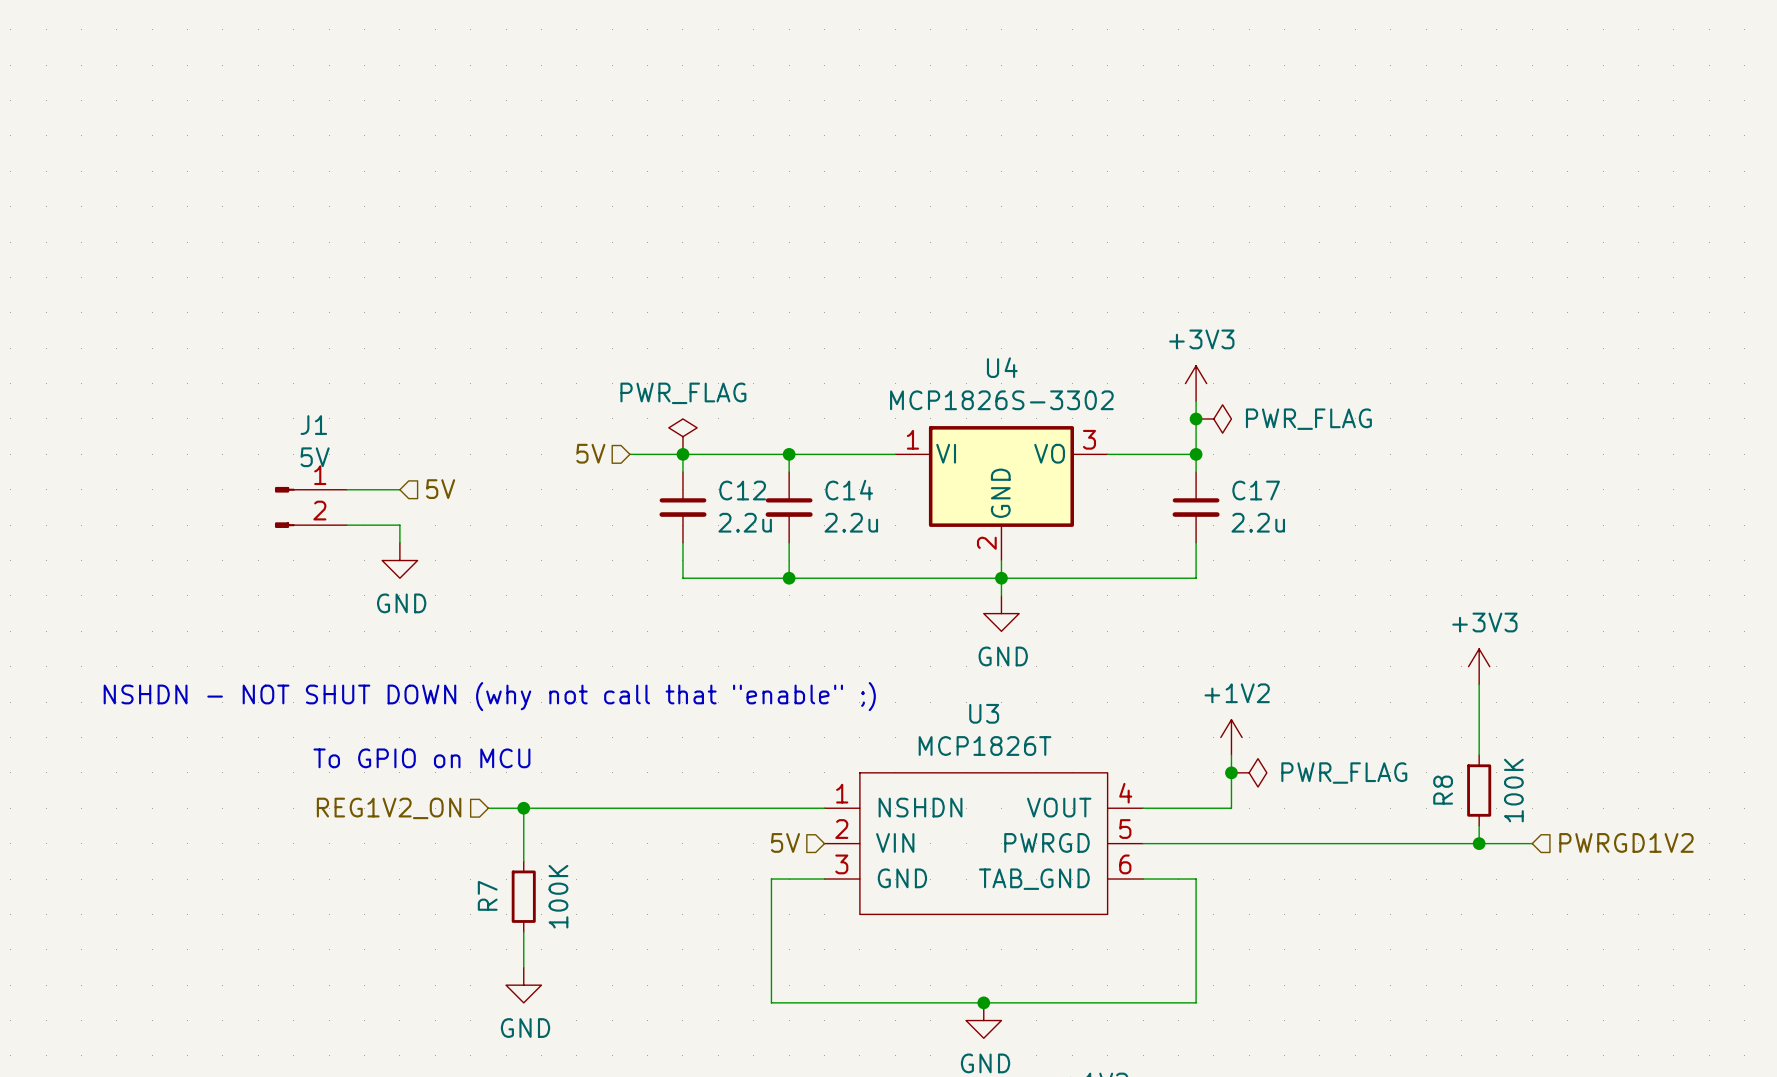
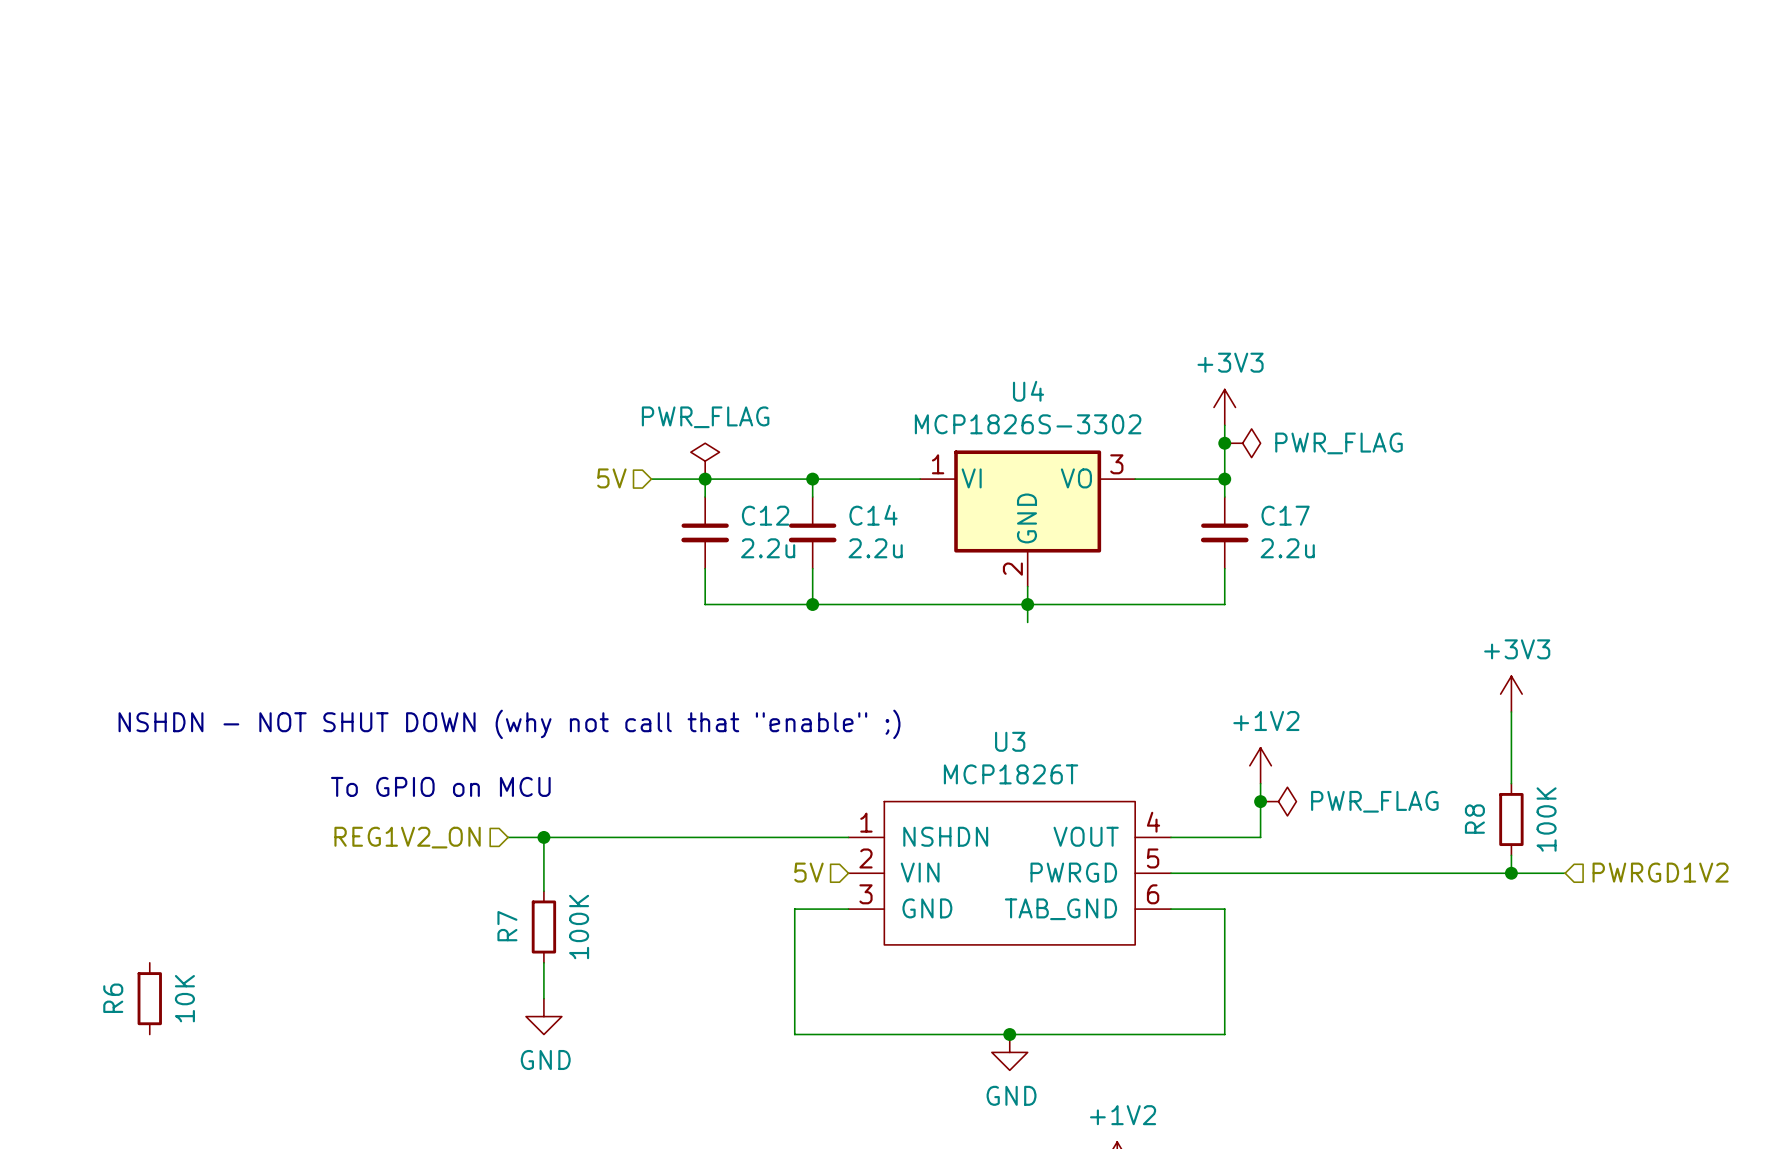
wire: (346, 489) (399, 489) -> none
hierarchical label: 5V (440, 489) -> none
J1: 5V (310, 507) -> none
wire: (346, 525) (399, 525) (399, 542) -> none
power symbol: GND (399, 560) -> none
power symbol: GND (1001, 613) -> none
R6: none -> 10K (149, 998)

